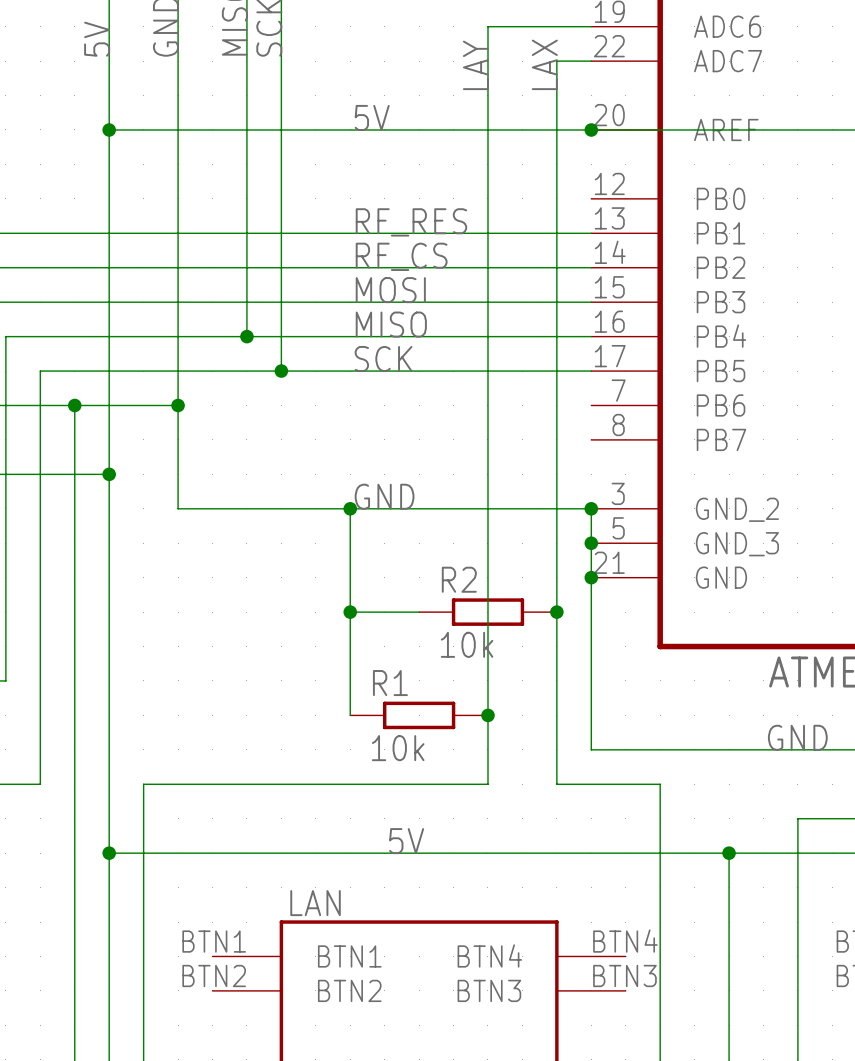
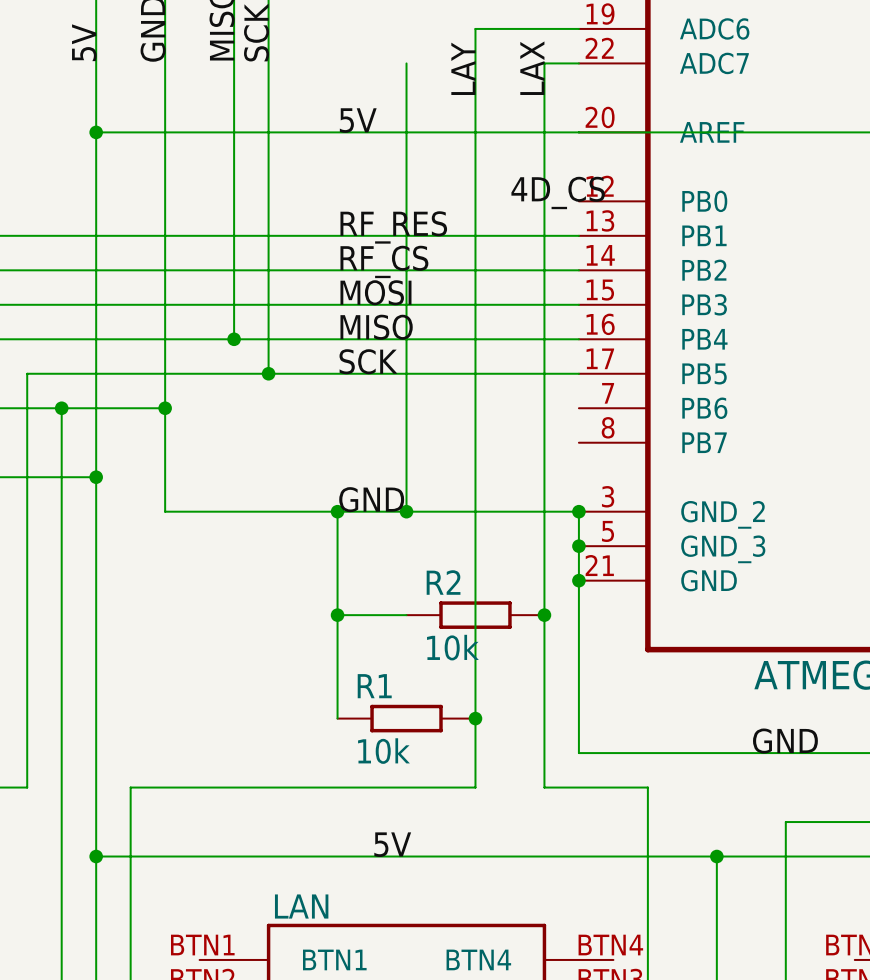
wire: none -> (406, 63) (406, 511)
junction: (591, 129) -> none
label: none -> 4D_CS (558, 192)
junction: none -> (406, 511)

